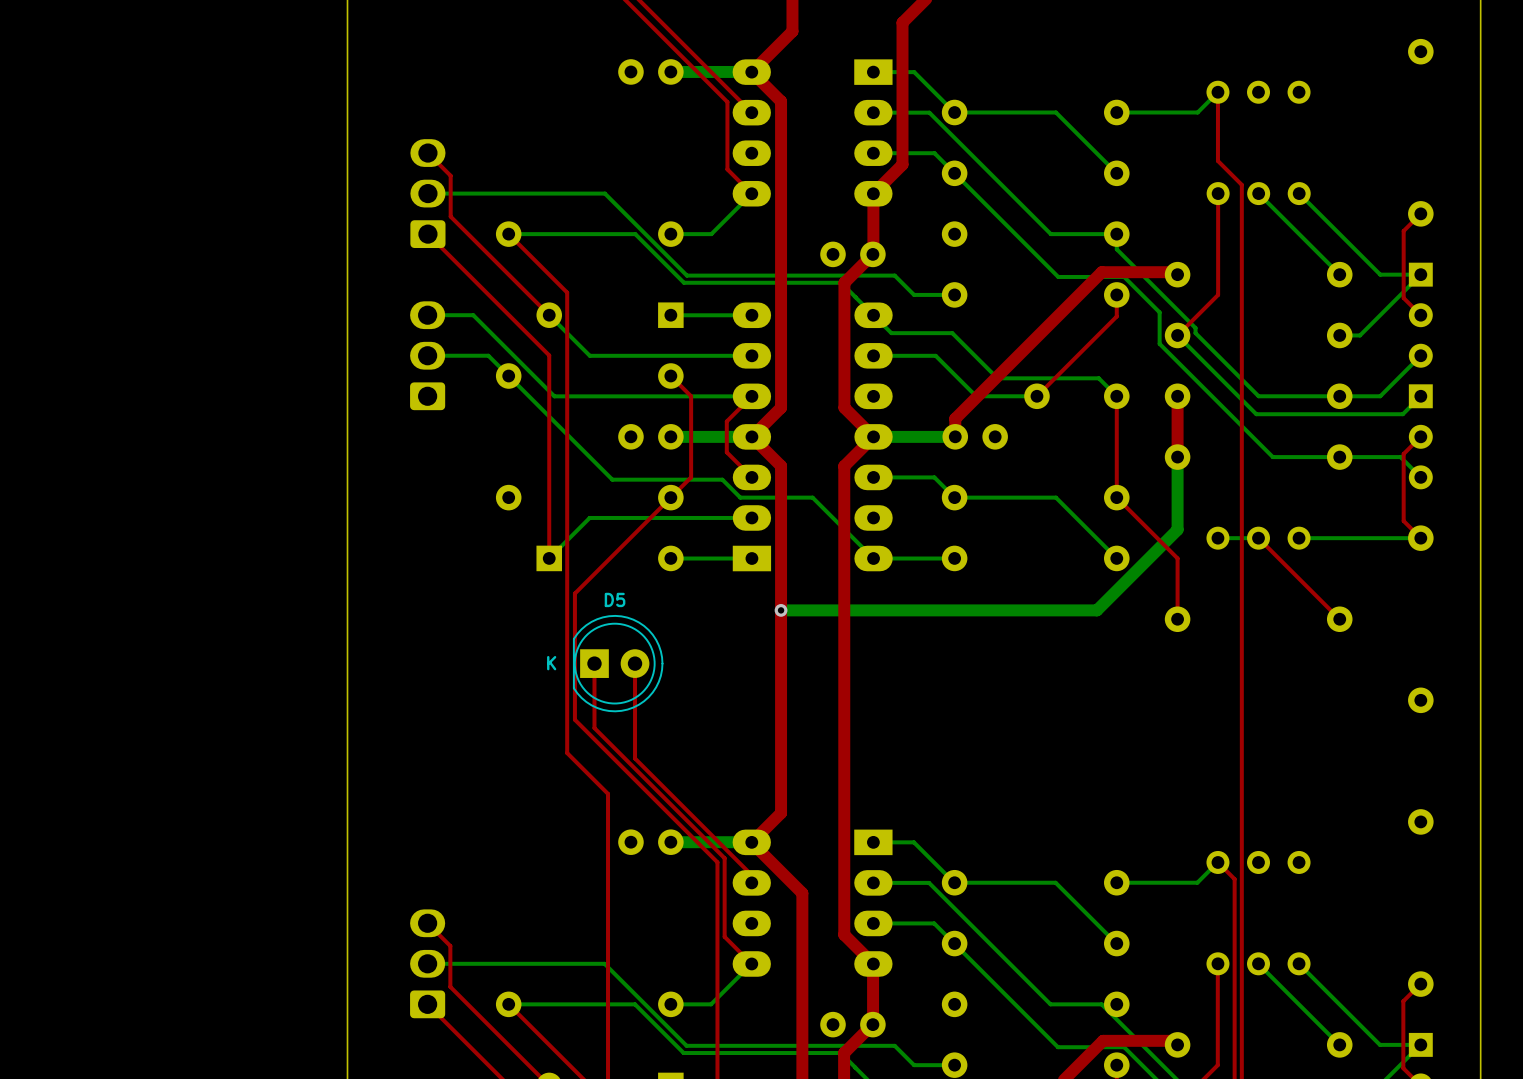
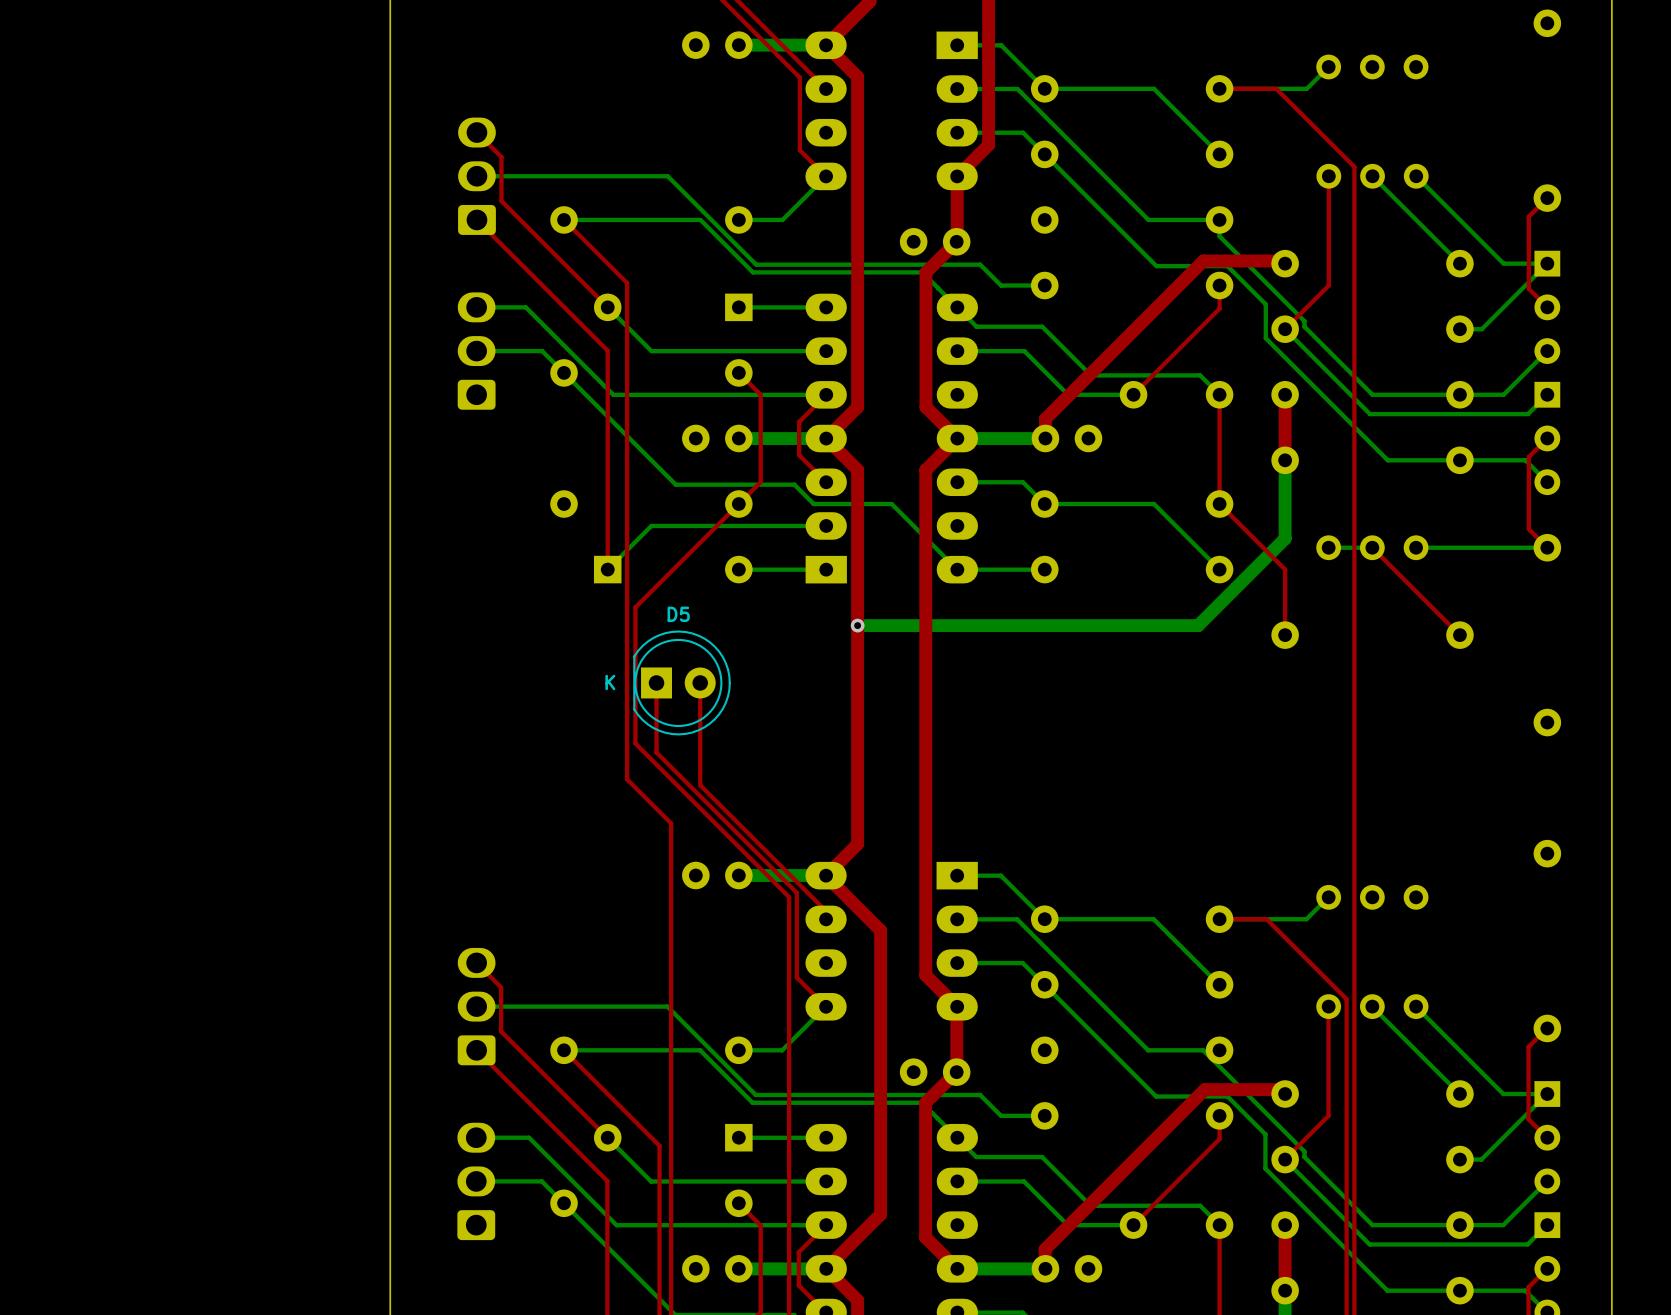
top track: (1217, 92) (1217, 160) -> (1219, 88) (1276, 88) (1328, 141)
top track: (1217, 862) (1234, 879) (1234, 956) -> (1219, 919) (1266, 919) (1346, 999)

